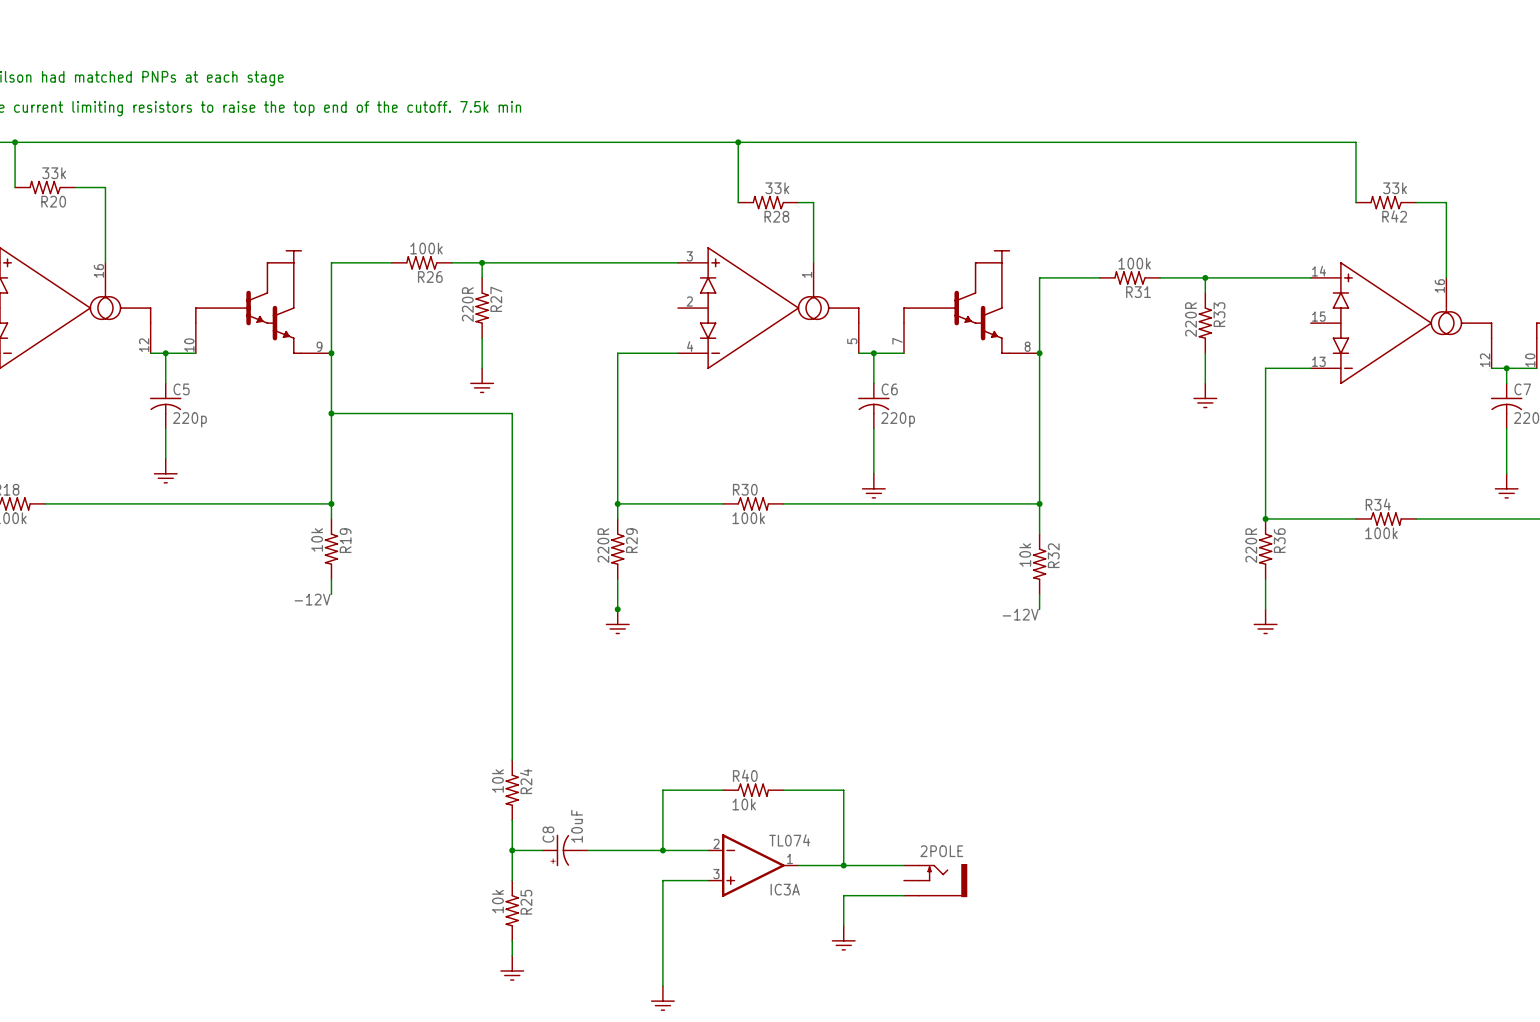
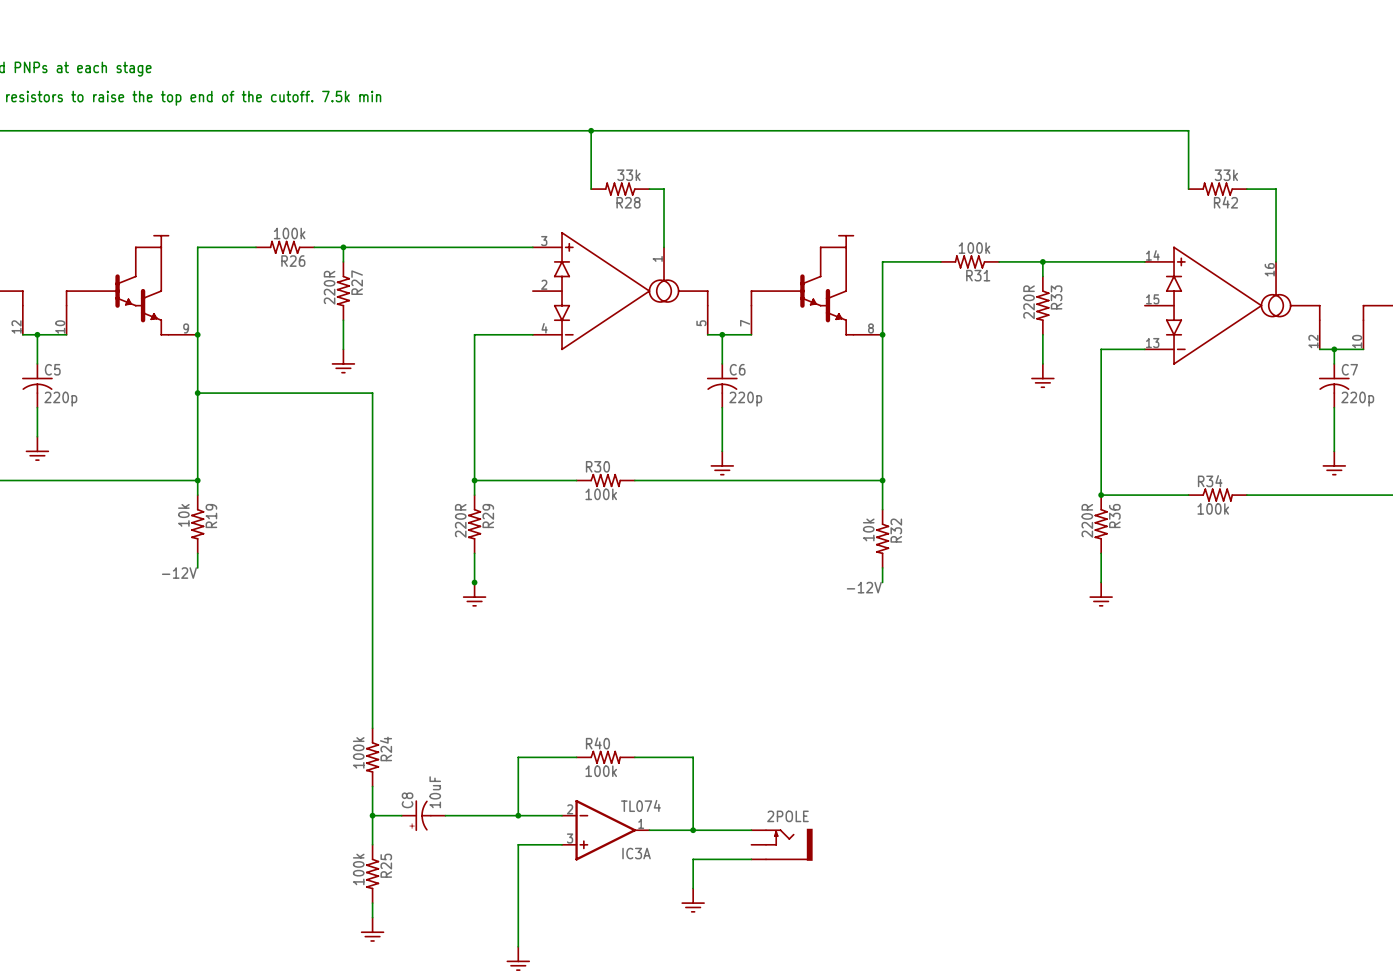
R24 value: 10k (497, 781) -> 100k (358, 752)
R40 value: 10k (744, 804) -> 100k (601, 771)
R25 value: 10k (497, 901) -> 100k (358, 869)

